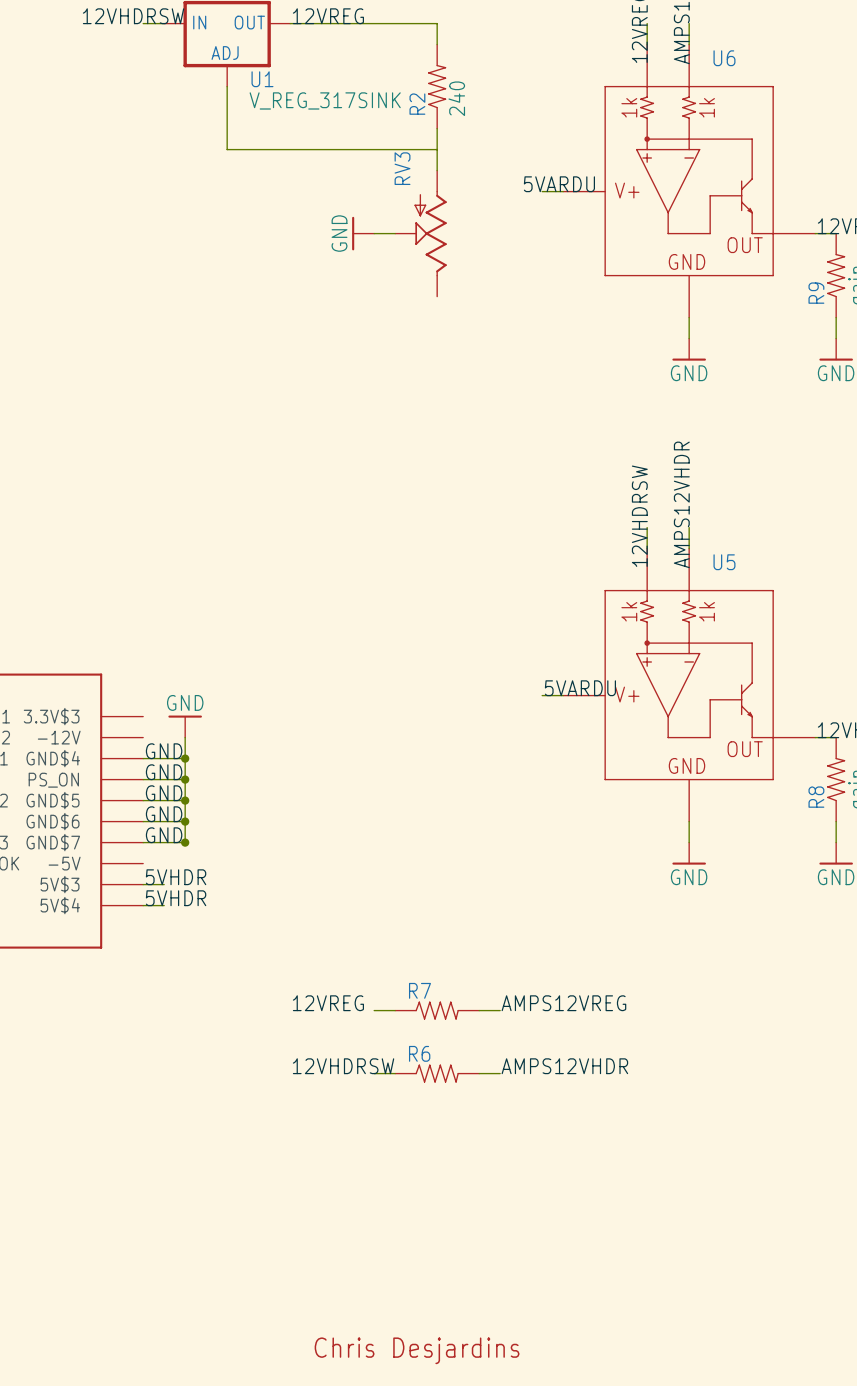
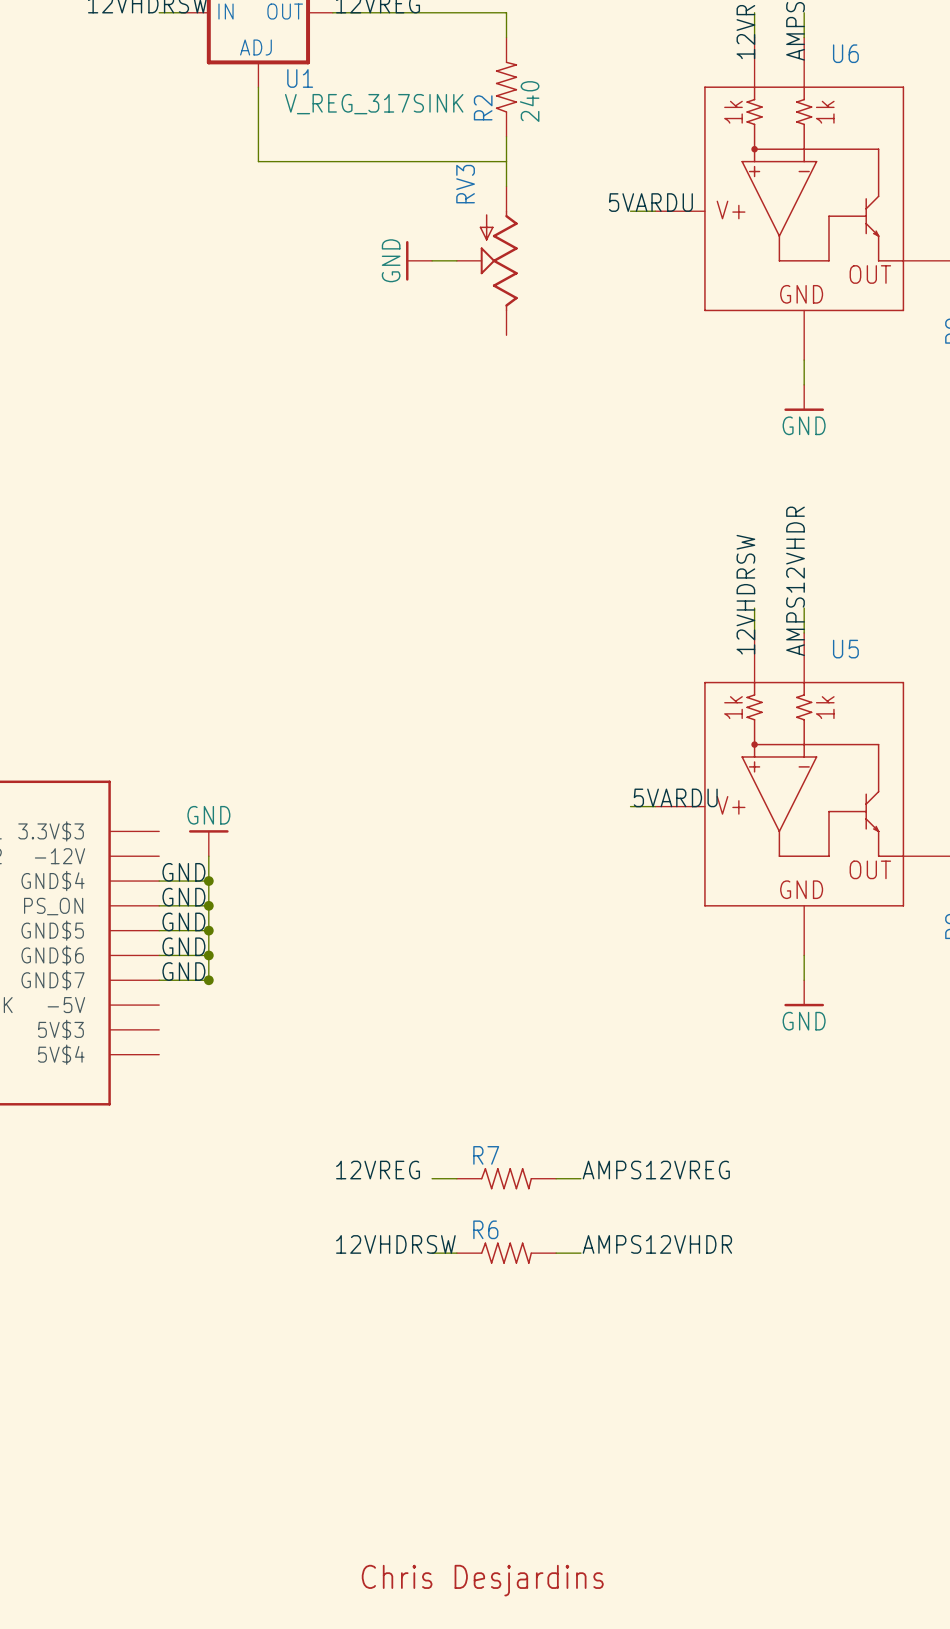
label: 5VHDR (176, 877) -> none
wire: (143, 884) (164, 884) -> none
label: 5VHDR (176, 898) -> none
wire: (143, 905) (164, 905) -> none

